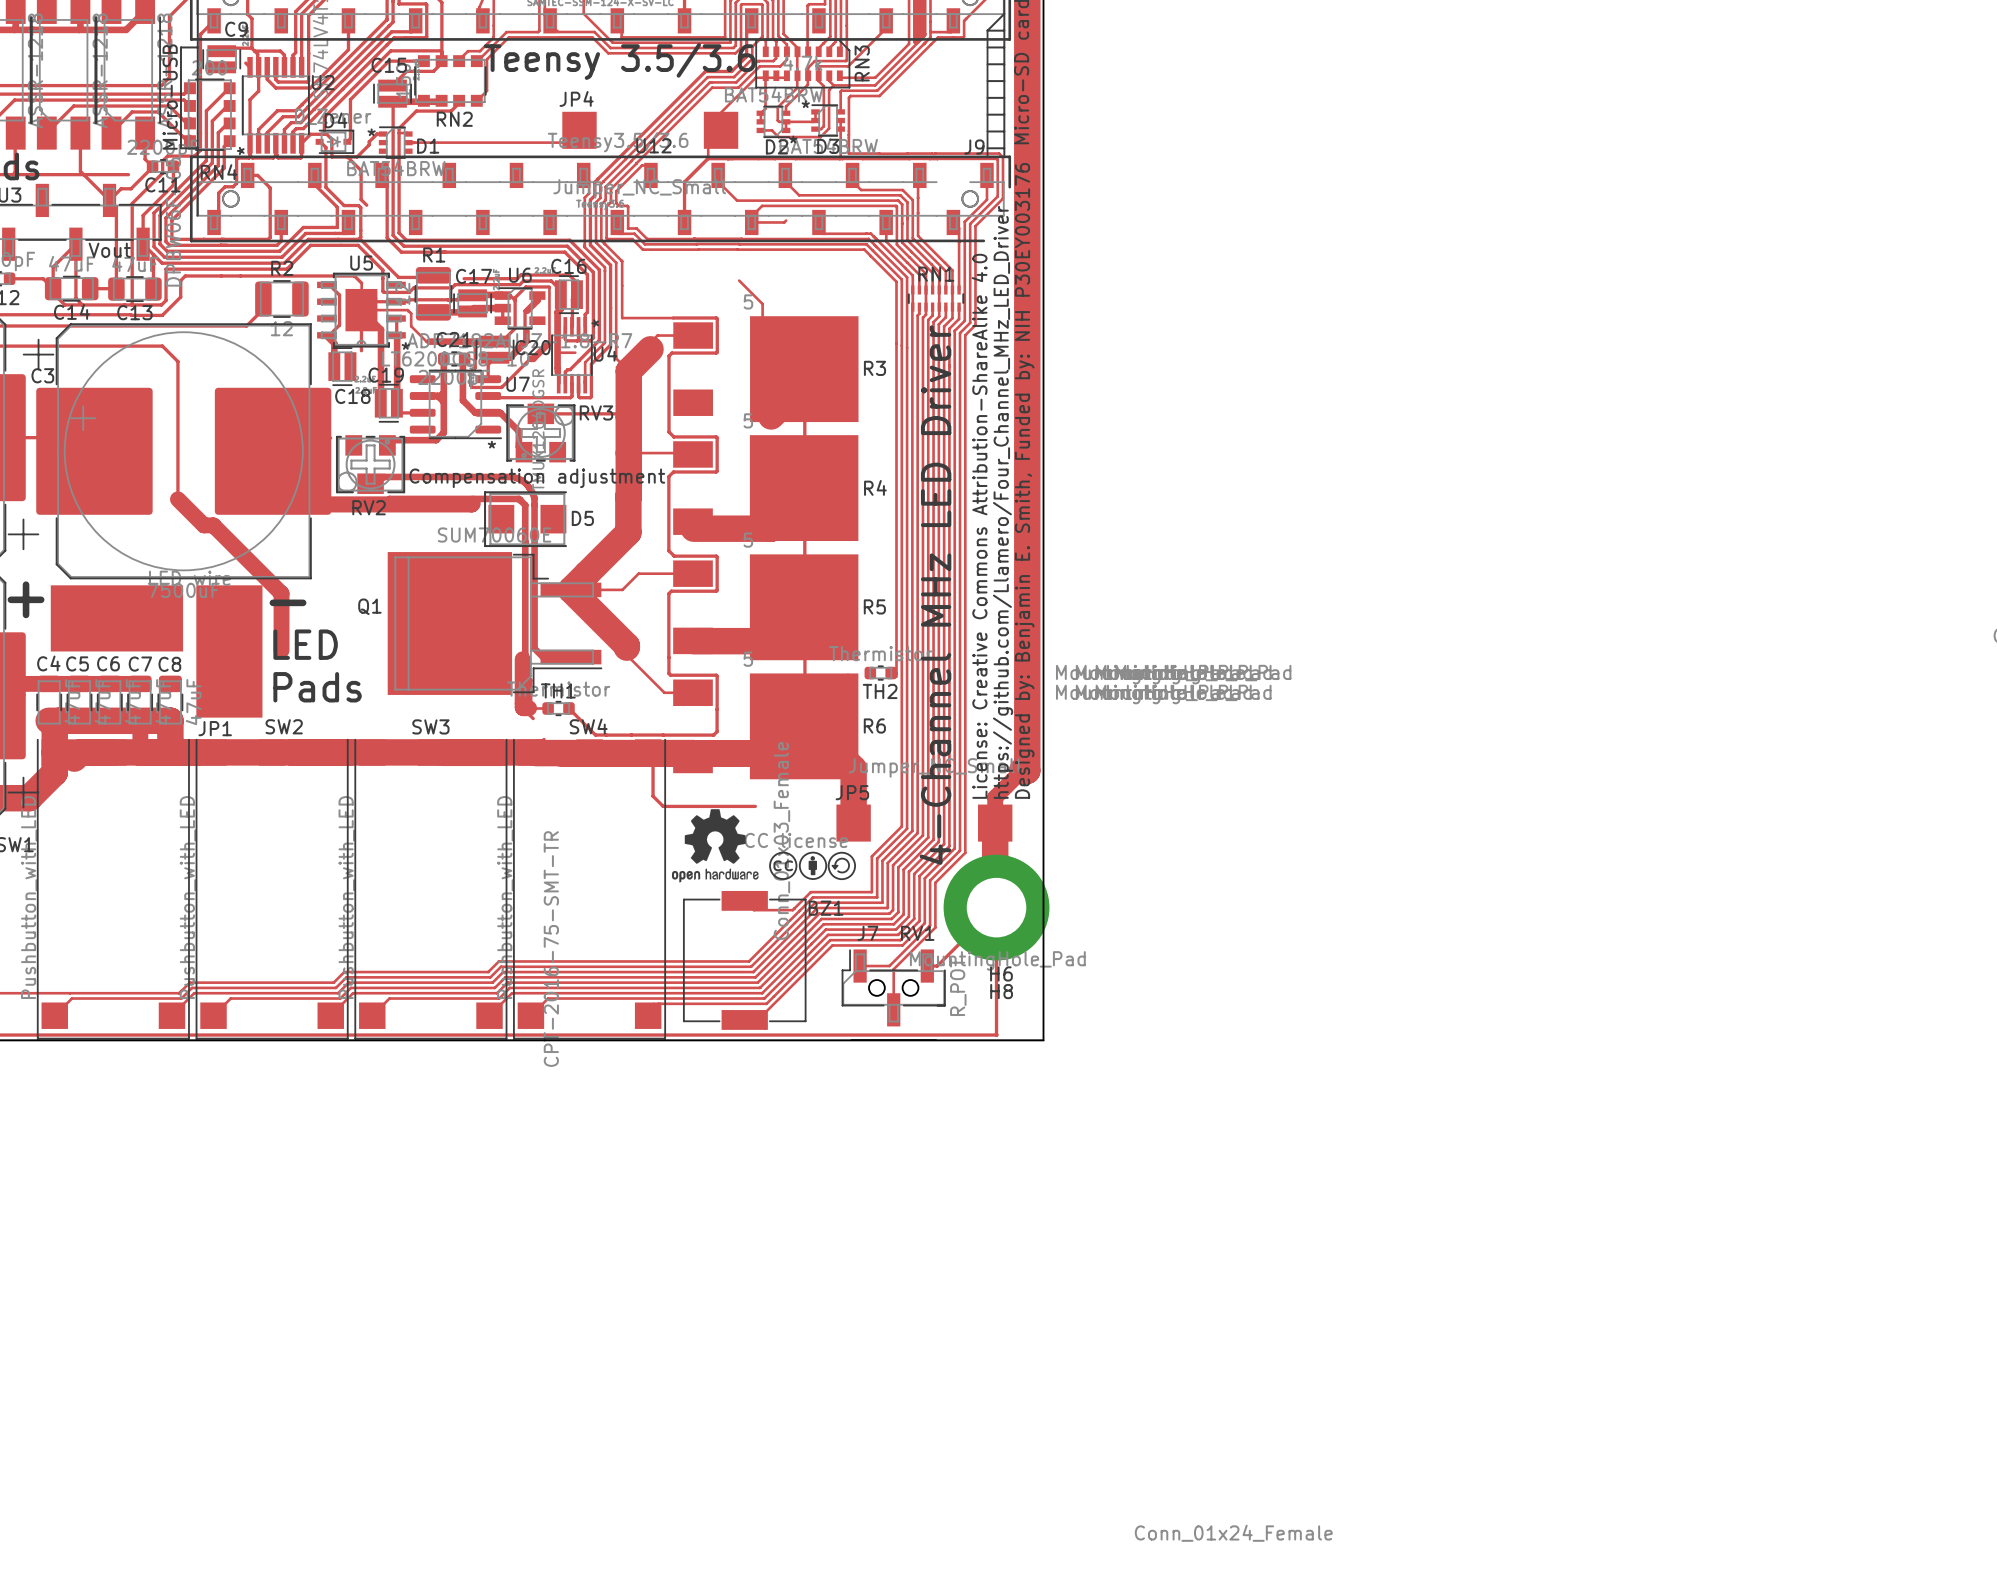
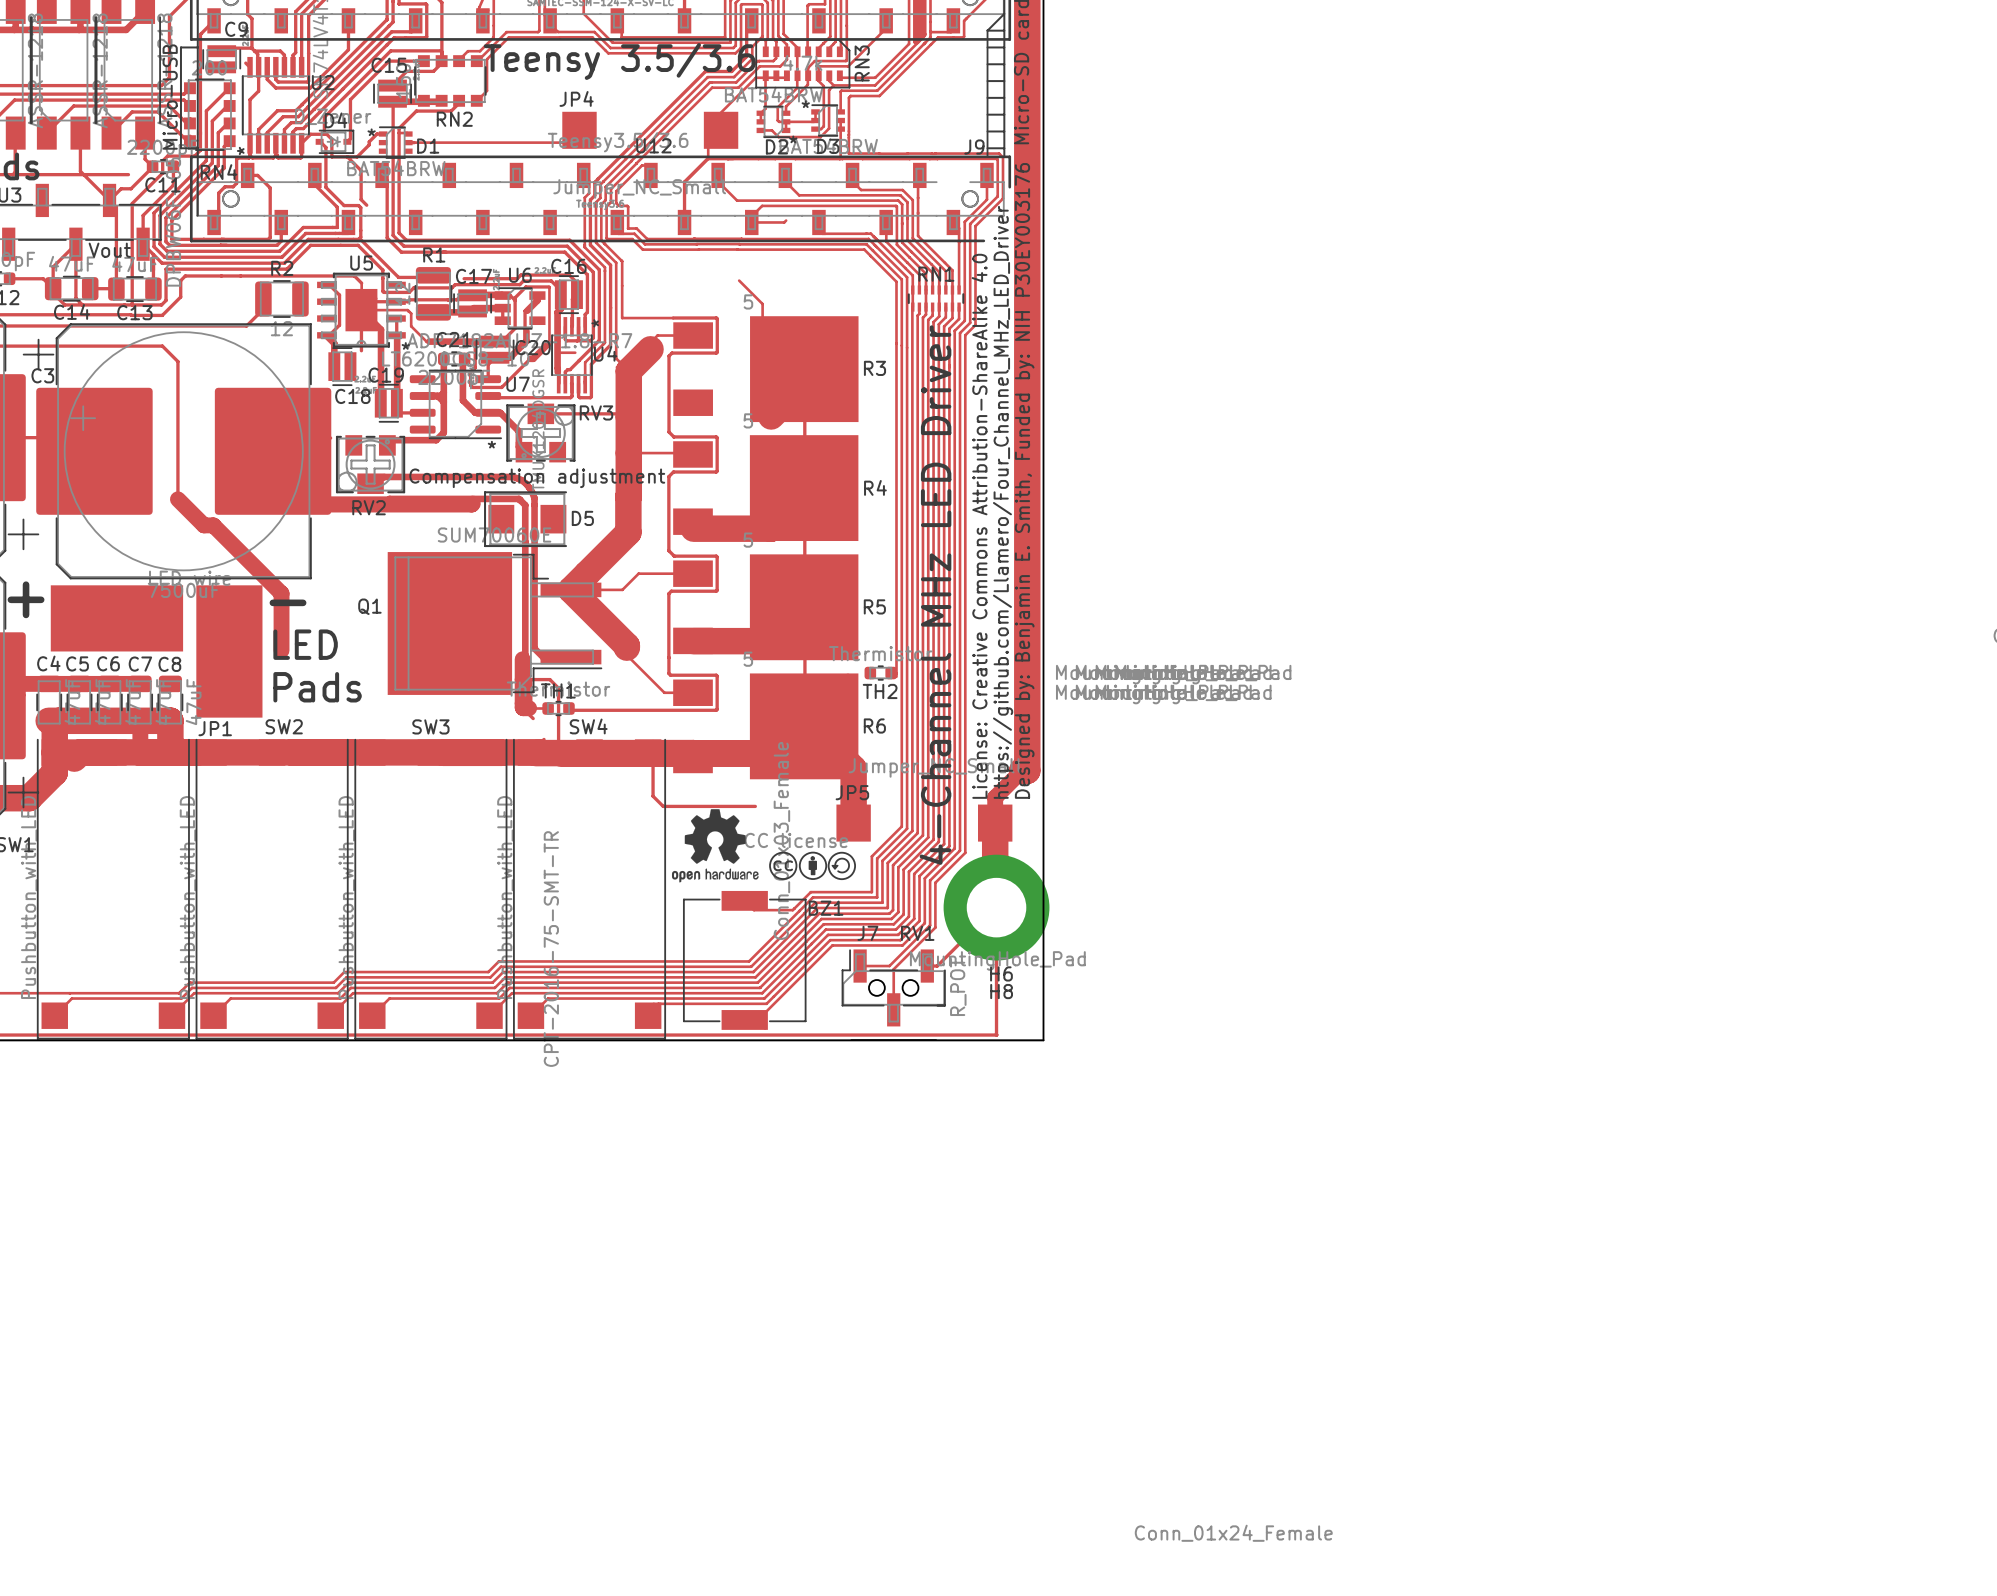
track: none -> (522, 679) (549, 679) (558, 688) (558, 750) (561, 753)
track: (717, 709) (717, 731) (713, 735) (663, 735) -> (717, 709) (570, 710)
track: (570, 710) (595, 735) (606, 735) -> none
track: (606, 735) (631, 735) -> none
track: (631, 735) (663, 735) -> none

